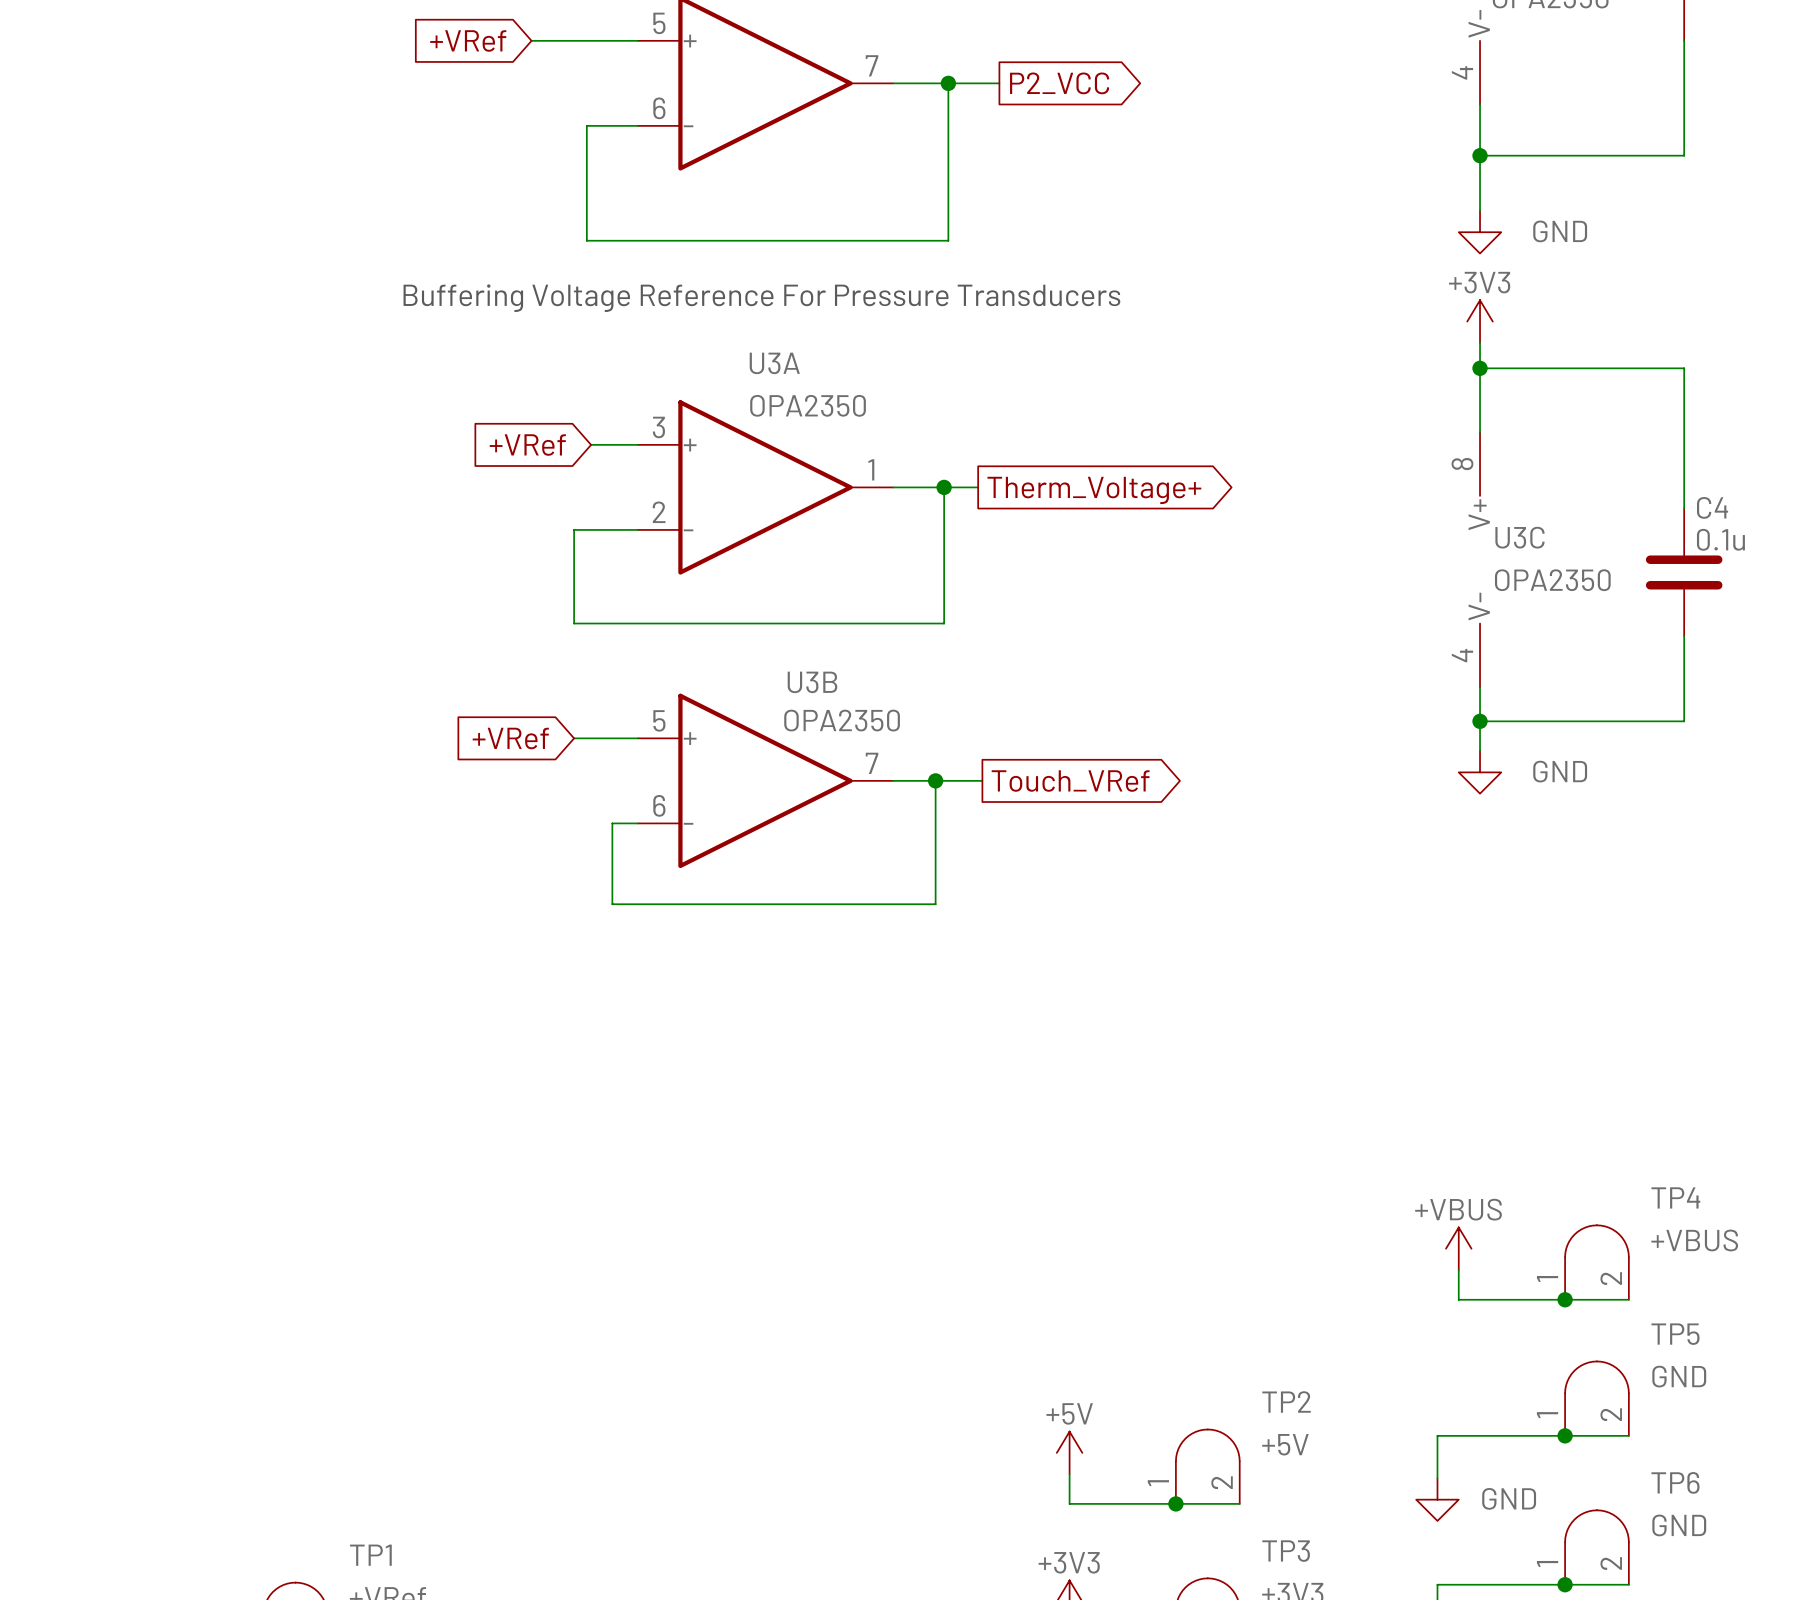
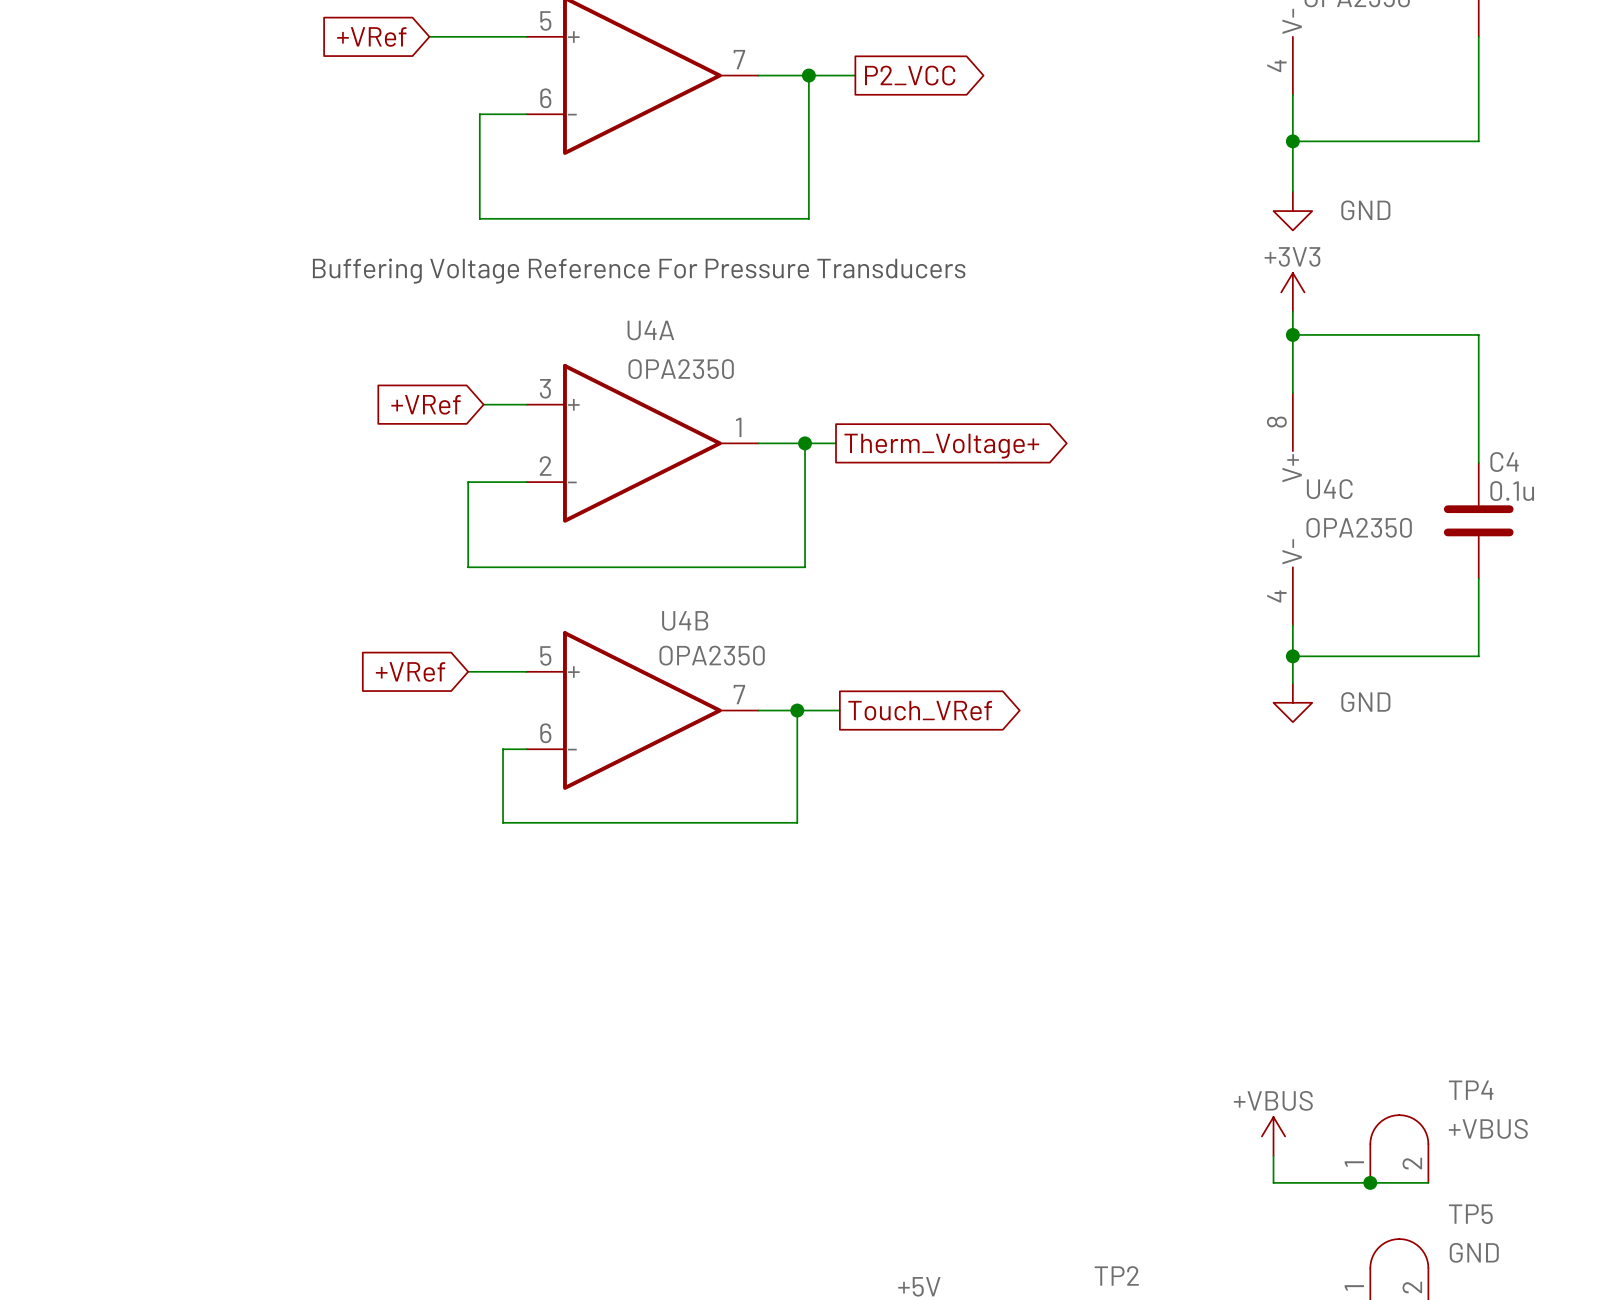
U3A name: U3A (774, 363) -> U4A (650, 330)
U3C name: U3C (1519, 537) -> U4C (1329, 489)
U3B name: U3B (812, 682) -> U4B (685, 620)

